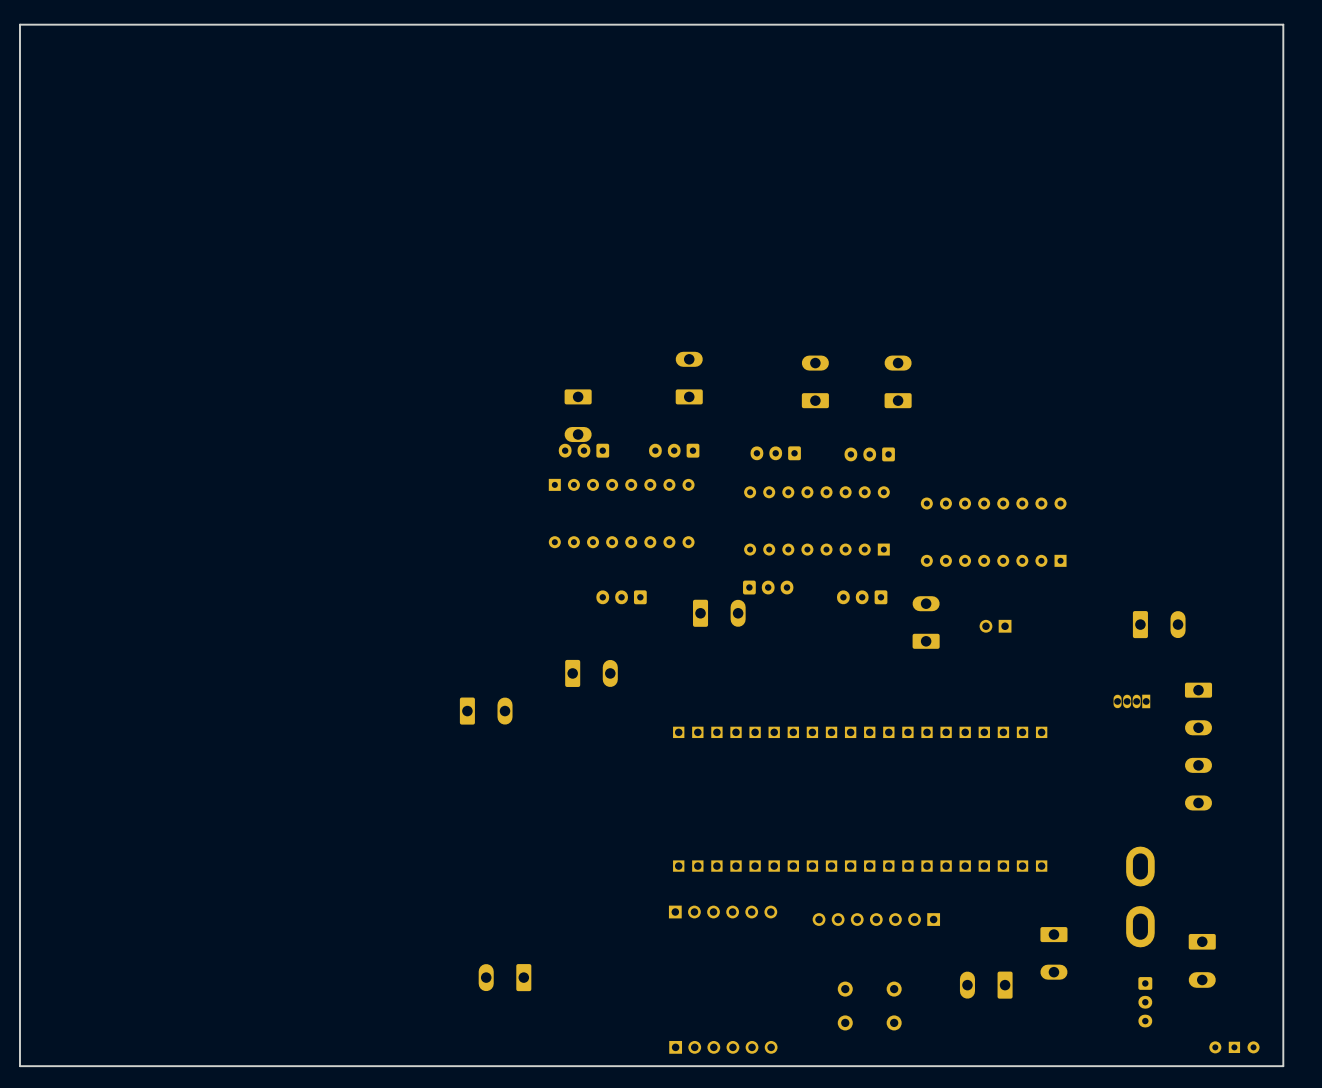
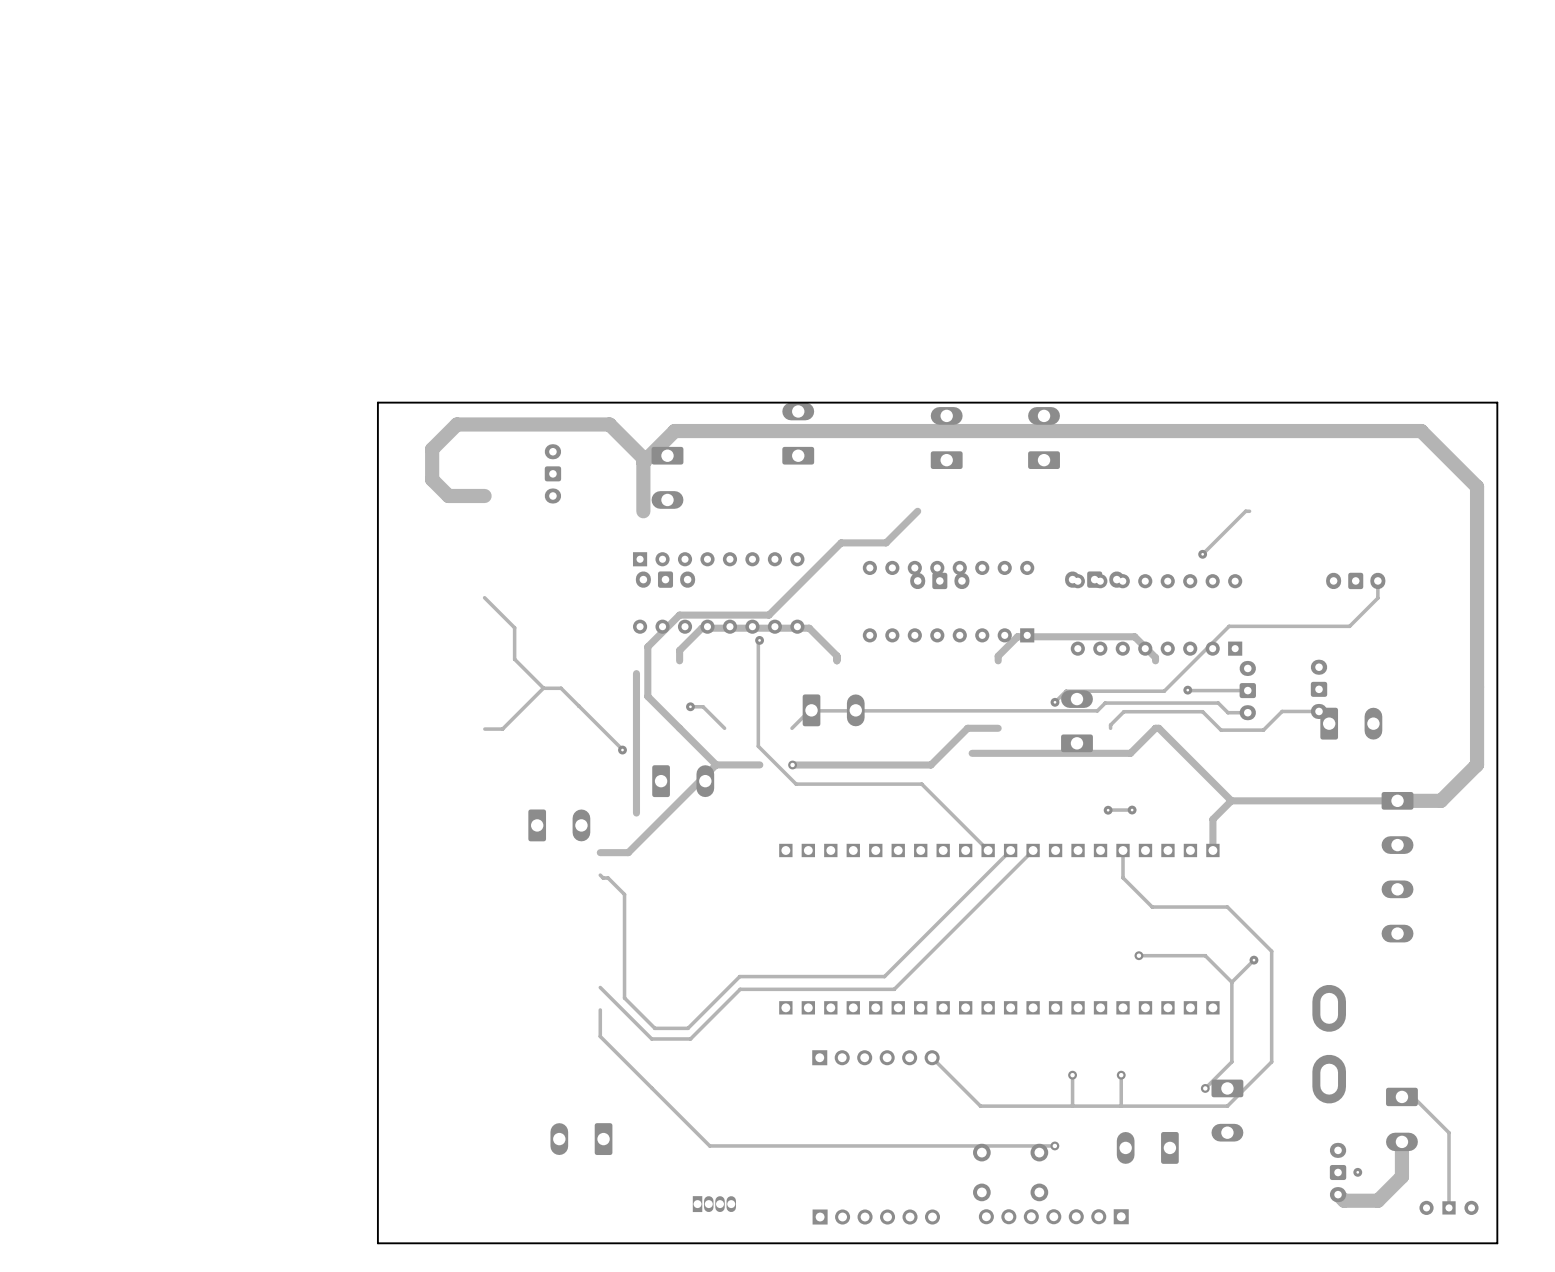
board edge: (1283, 351) (1283, 24) (19, 24) (19, 1066) (332, 1066) -> (1497, 402) (377, 402) (377, 1243)
track: none -> (645, 460) (609, 424) (456, 424) (432, 449) (432, 479) (448, 495) (484, 495)
part: none -> (552, 473)
track: none -> (643, 511) (643, 462) (674, 431) (1421, 431) (1477, 486) (1477, 764) (1440, 800) (1231, 800)
track: none -> (917, 511) (886, 542) (841, 542) (768, 615) (679, 615) (647, 646) (647, 696) (716, 764)
track: none -> (1249, 511) (1245, 511) (1202, 554)
part: (583, 450) -> none
part: (674, 450) -> none
part: (775, 453) -> none
part: (869, 454) -> none
via: none -> (1202, 554)
part: none -> (665, 579)
part: none -> (1094, 579)
part: none -> (939, 580)
part: none -> (1355, 580)
track: none -> (1377, 580) (1377, 598) (1349, 626) (1229, 626) (1164, 691) (1066, 691) (1055, 702)
track: none -> (484, 597) (514, 627) (514, 659) (543, 688)
track: none -> (759, 640) (758, 746) (796, 784) (921, 784) (988, 850)
via: none -> (759, 640)
track: none -> (836, 660) (836, 655) (809, 628) (701, 628) (679, 650) (679, 660)
track: none -> (1155, 660) (1155, 657) (1134, 636) (1017, 636) (998, 656) (998, 660)
track: none -> (636, 673) (636, 813)
part: (768, 587) -> none
track: none -> (543, 688) (502, 729) (484, 729)
track: none -> (543, 688) (561, 688) (578, 706)
part: none -> (1319, 689)
track: none -> (1187, 690) (1247, 690)
via: none -> (1187, 690)
part: none -> (1247, 690)
part: (621, 597) -> none
part: (862, 597) -> none
via: none -> (1055, 702)
track: none -> (578, 706) (622, 750)
track: none -> (690, 706) (703, 706) (724, 728)
via: none -> (690, 706)
track: none -> (1319, 711) (1282, 711) (1263, 730) (1221, 730) (1202, 711) (1123, 711) (1110, 725) (1110, 728)
track: none -> (1247, 712) (1227, 712) (1218, 703) (1105, 703) (1097, 710) (809, 710) (792, 728)
part: (995, 626) -> none
track: none -> (998, 728) (967, 728) (930, 765) (792, 765)
via: none -> (622, 750)
track: none -> (972, 753) (1130, 753) (1155, 728) (1158, 728) (1231, 800)
track: none -> (759, 764) (716, 764) (628, 852) (600, 852)
via: none -> (792, 765)
track: none -> (1231, 800) (1212, 819) (1212, 850)
via: none -> (1108, 810)
track: none -> (1132, 810) (1108, 810)
via: none -> (1132, 810)
part: (1131, 701) -> none
track: none -> (1010, 850) (884, 976) (739, 976) (687, 1028) (654, 1028) (624, 998) (624, 894) (608, 878) (603, 878) (600, 875)
track: none -> (1033, 850) (894, 989) (740, 989) (690, 1038) (651, 1038) (600, 987)
track: none -> (1123, 850) (1123, 877) (1152, 907) (1227, 907) (1271, 951) (1271, 1061) (1227, 1106) (980, 1106) (932, 1057)
track: none -> (1138, 955) (1205, 955) (1231, 982)
via: none -> (1138, 955)
track: none -> (1253, 960) (1231, 982)
via: none -> (1253, 960)
track: none -> (1231, 982) (1231, 1061) (1205, 1088)
track: none -> (600, 1009) (600, 1036) (709, 1145) (1054, 1145)
part position: (723, 912) -> (875, 1057)
part position: (876, 919) -> (1053, 1216)
track: none -> (1072, 1075) (1072, 1106)
via: none -> (1072, 1075)
track: none -> (1121, 1075) (1121, 1106)
via: none -> (1121, 1075)
via: none -> (1205, 1088)
track: none -> (1401, 1096) (1413, 1096) (1449, 1132) (1449, 1207)
part footprint: [1138, 977, 1153, 1028] -> [1329, 1142, 1347, 1203]
track: none -> (1401, 1141) (1401, 1176) (1377, 1200) (1344, 1200) (1338, 1194)
via: none -> (1054, 1145)
via: none -> (1357, 1172)
part: none -> (714, 1204)
part position: (723, 1047) -> (876, 1217)
part position: (1234, 1047) -> (1449, 1207)

